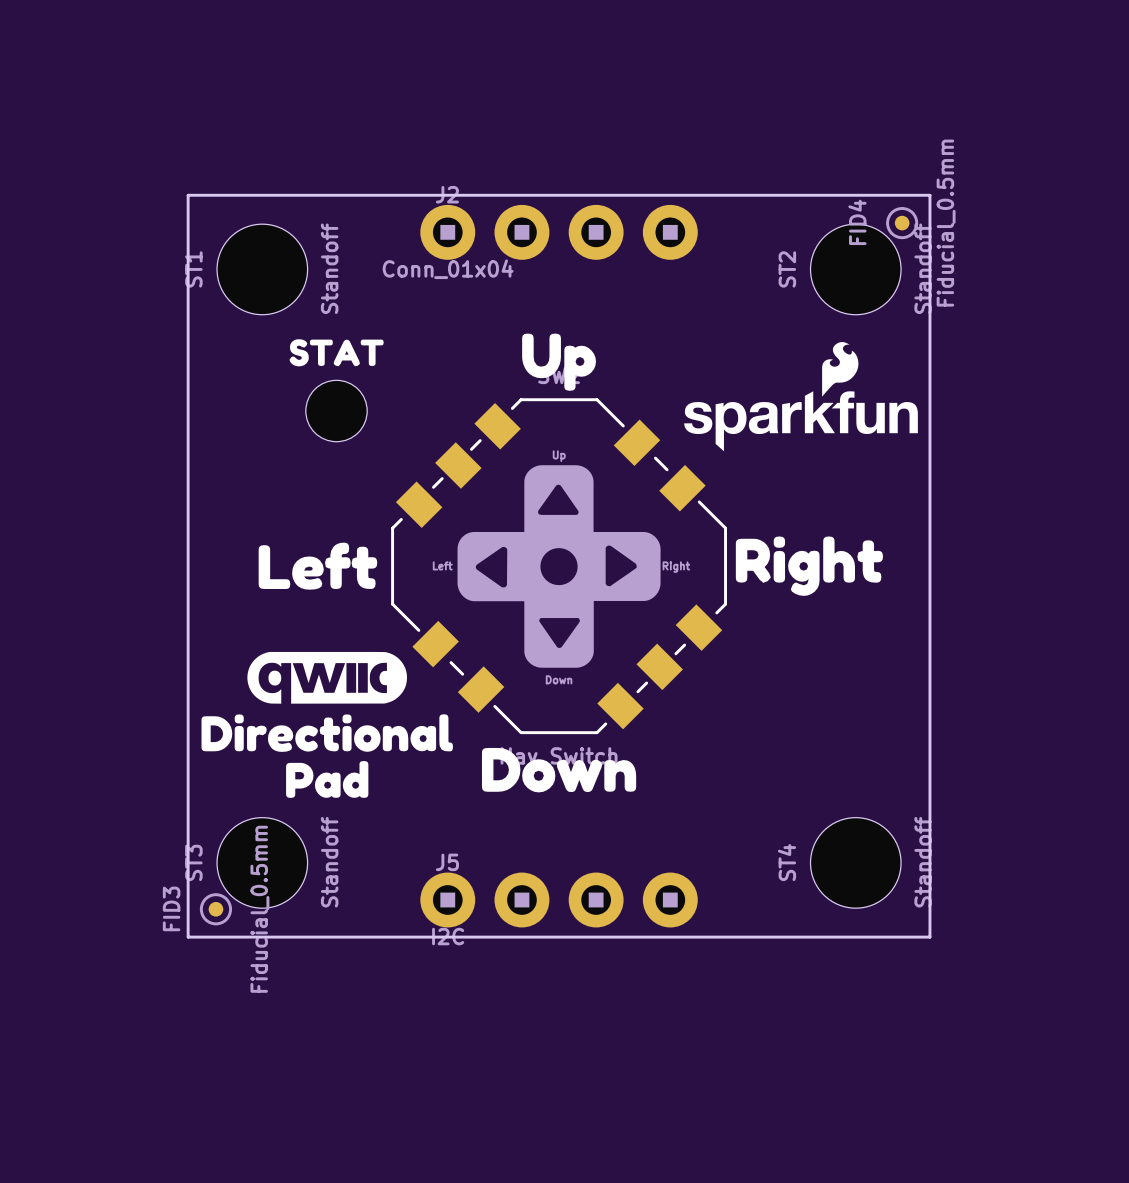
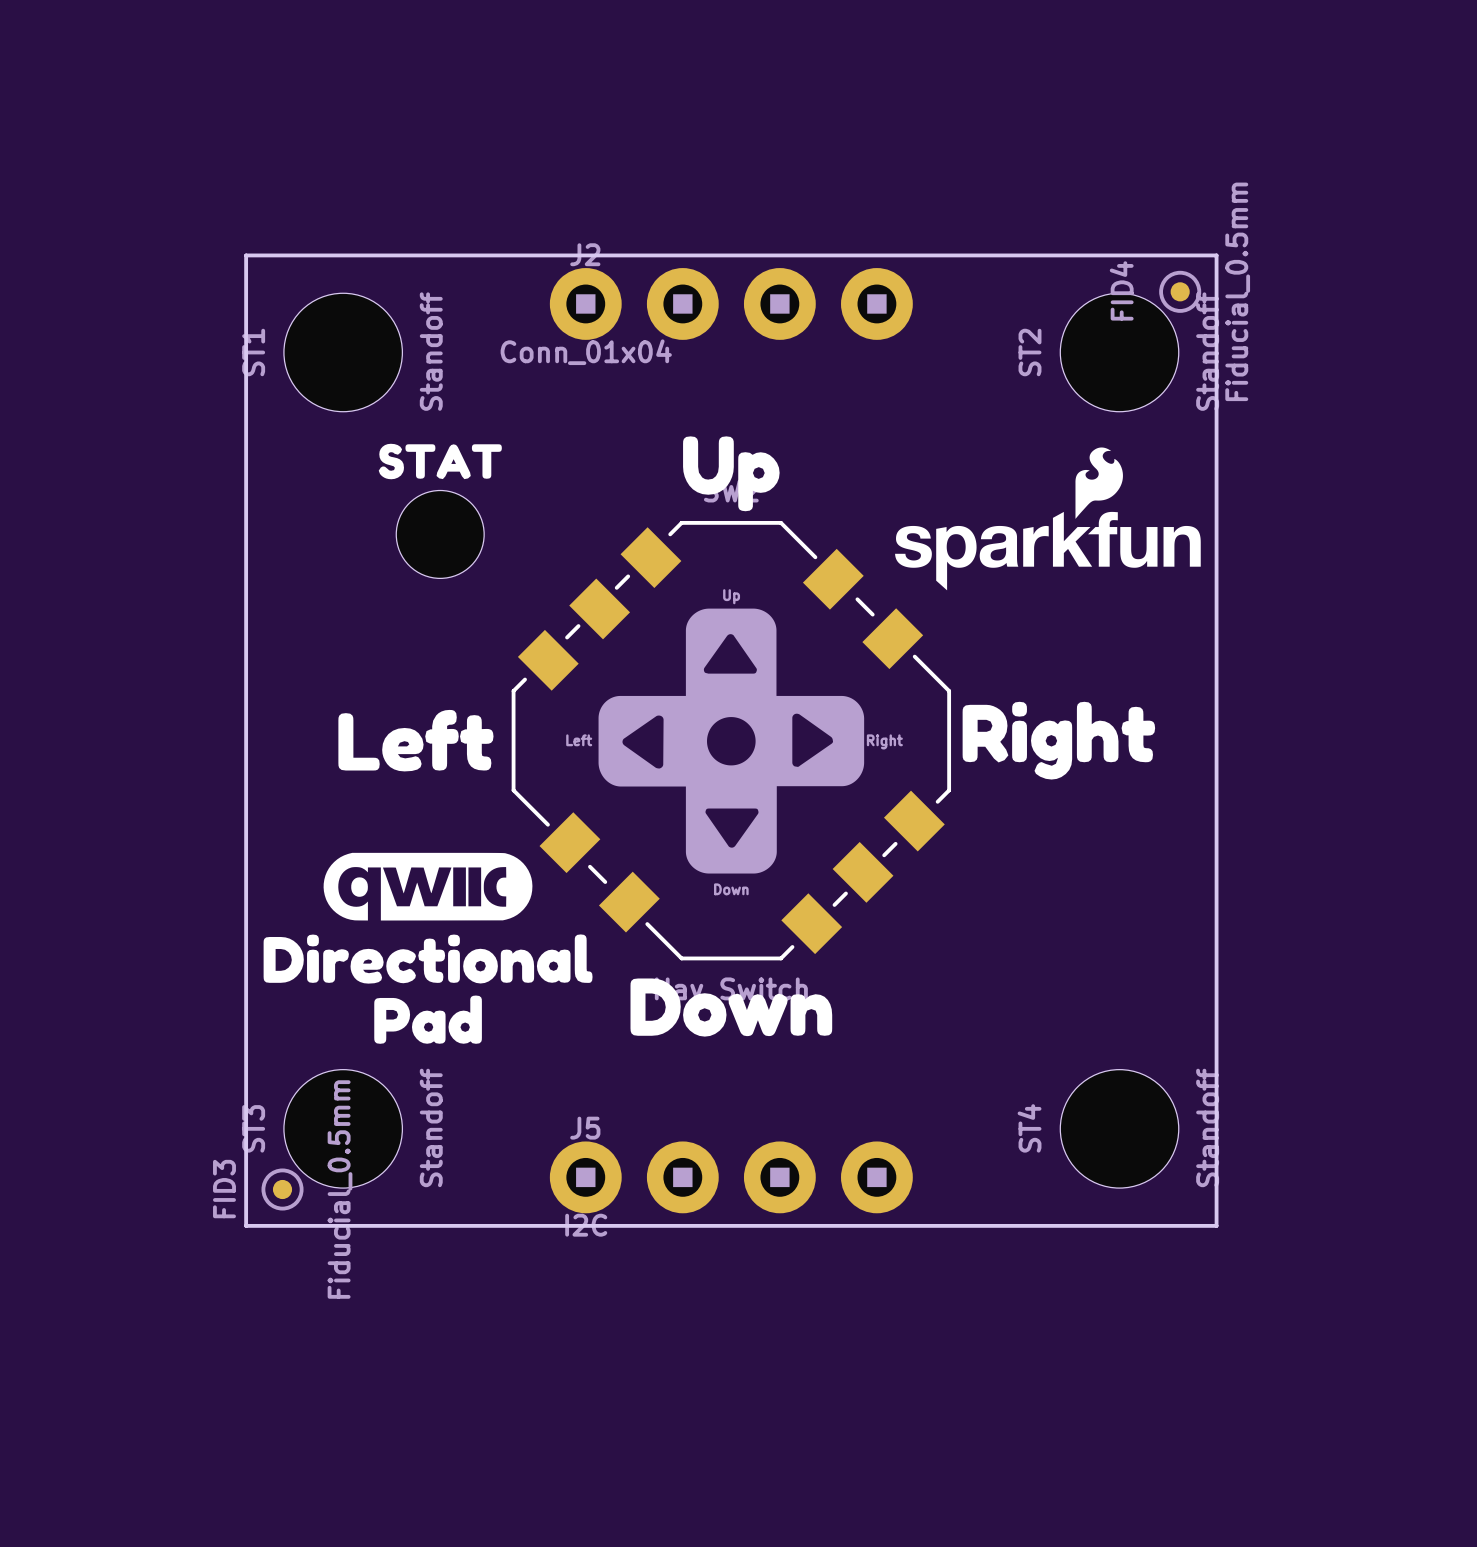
part footprint: [305, 380, 368, 442] -> [396, 490, 485, 579]

